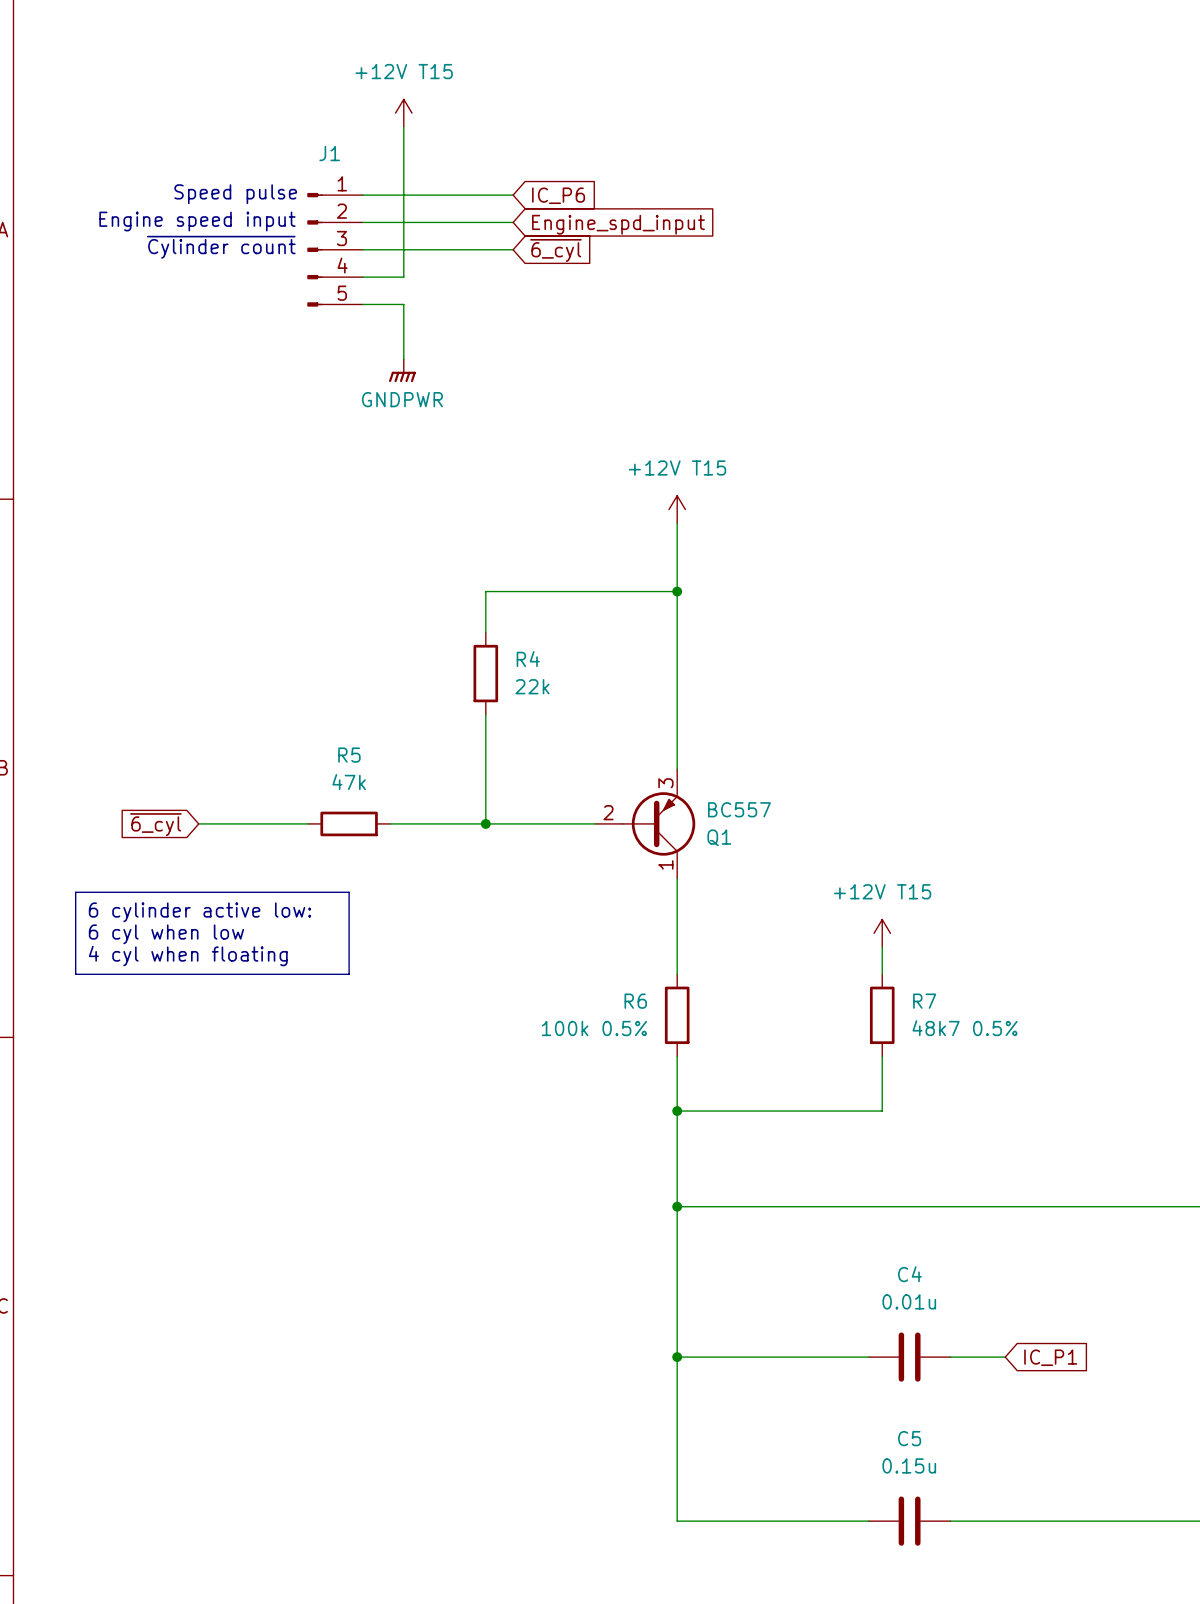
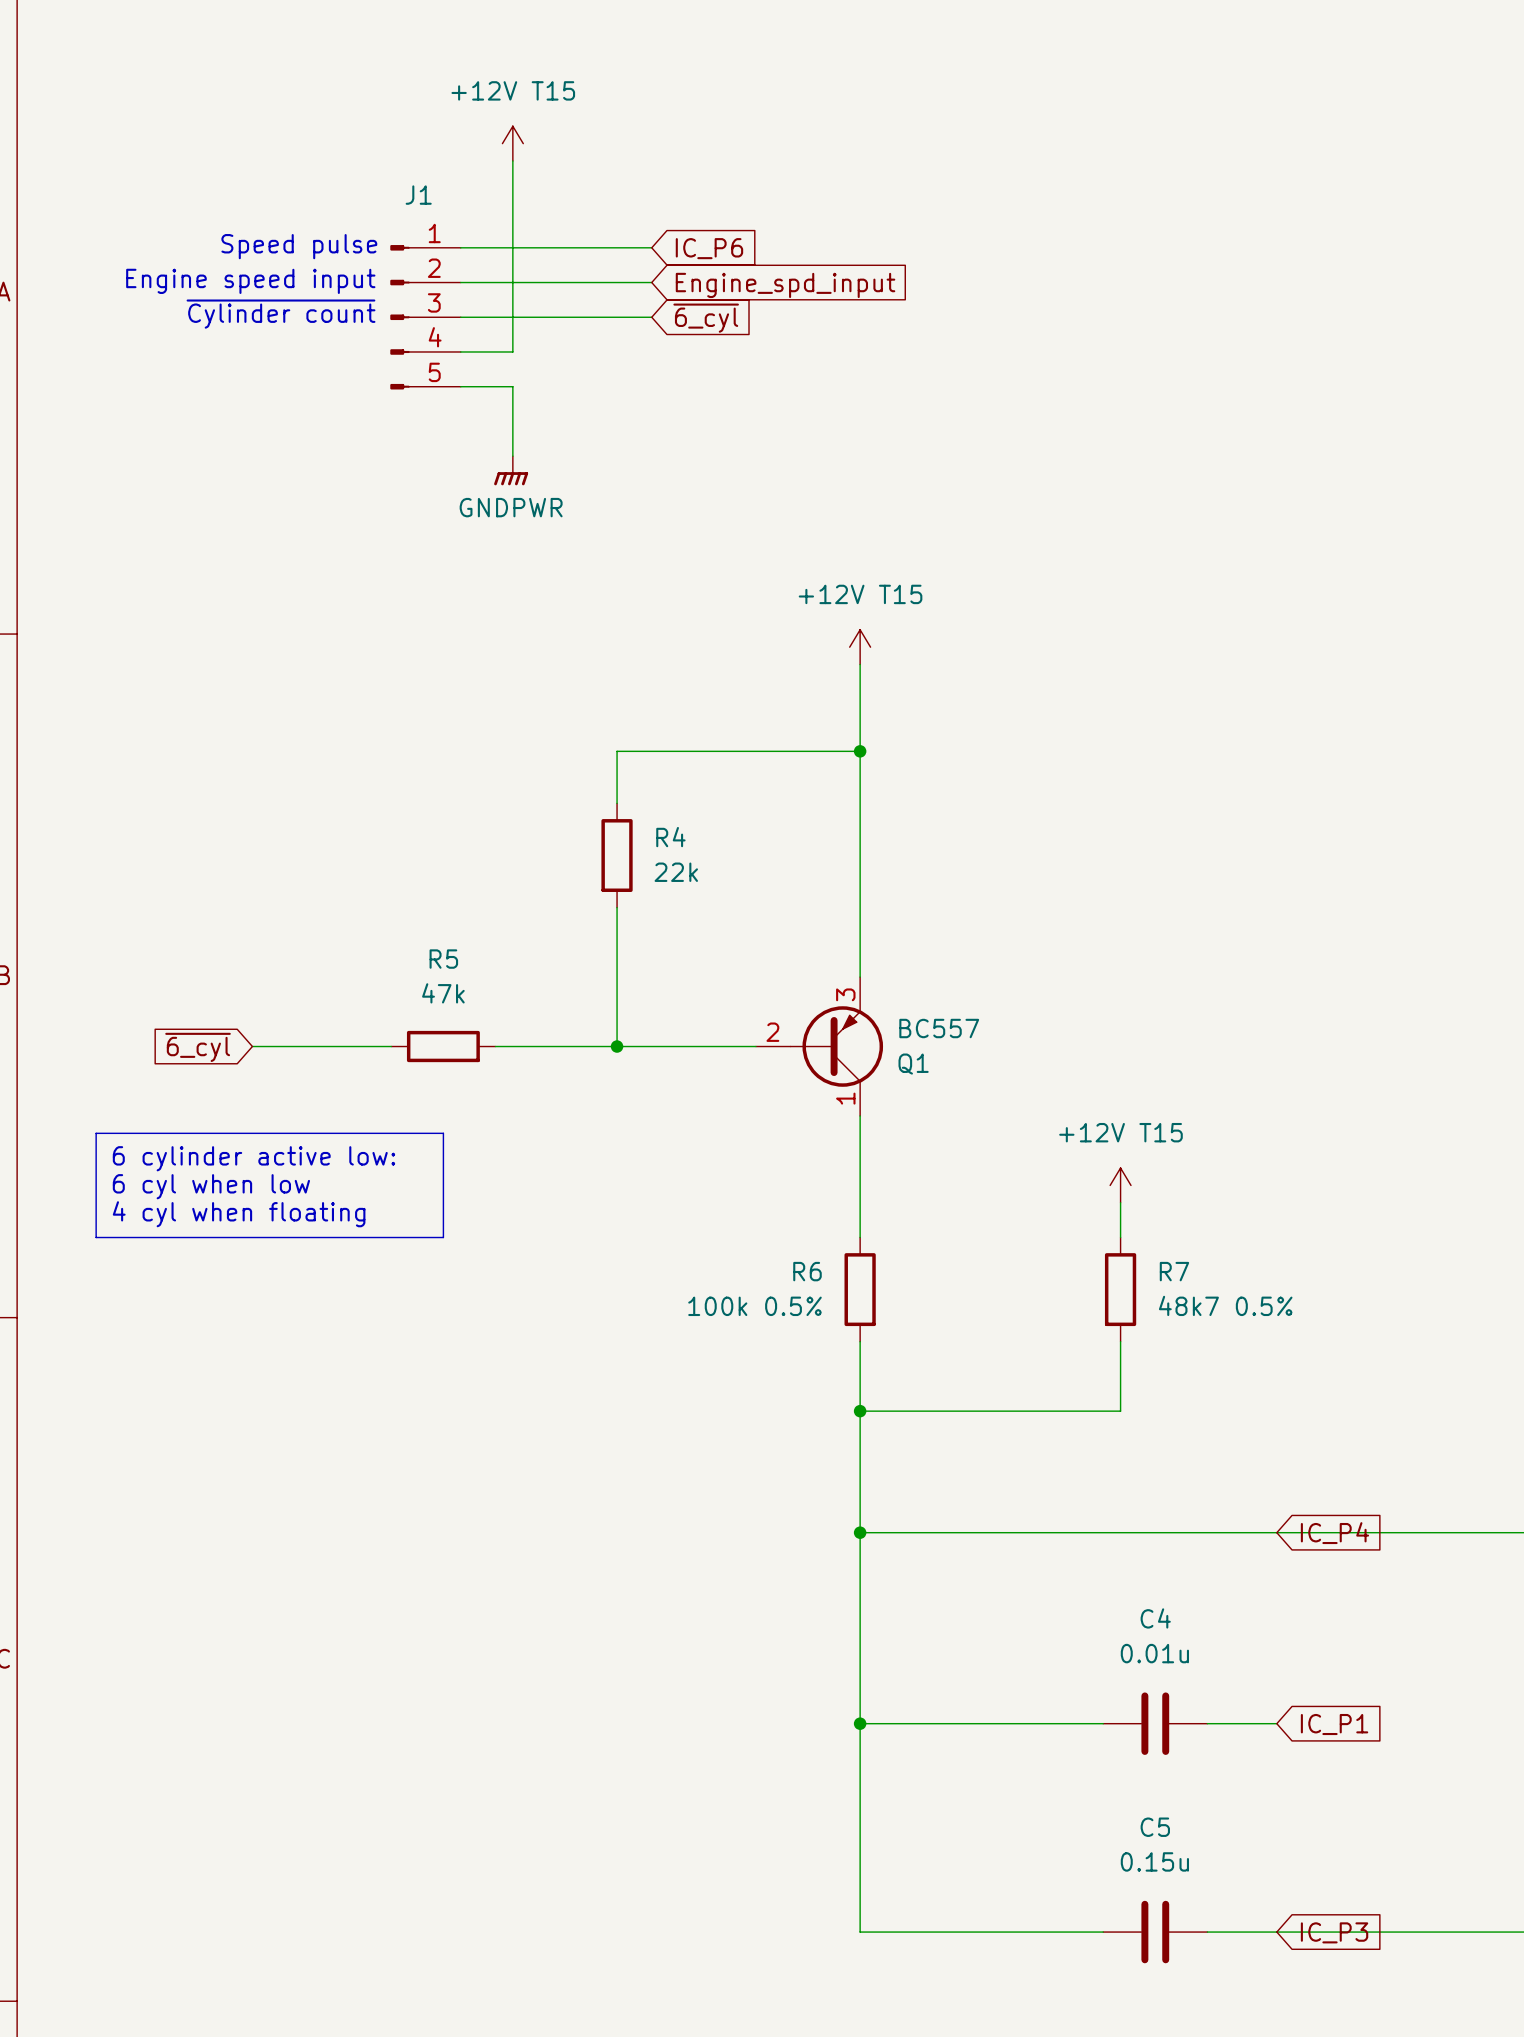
global label: none -> IC_P4 (1334, 1533)
global label: none -> IC_P3 (1334, 1932)

